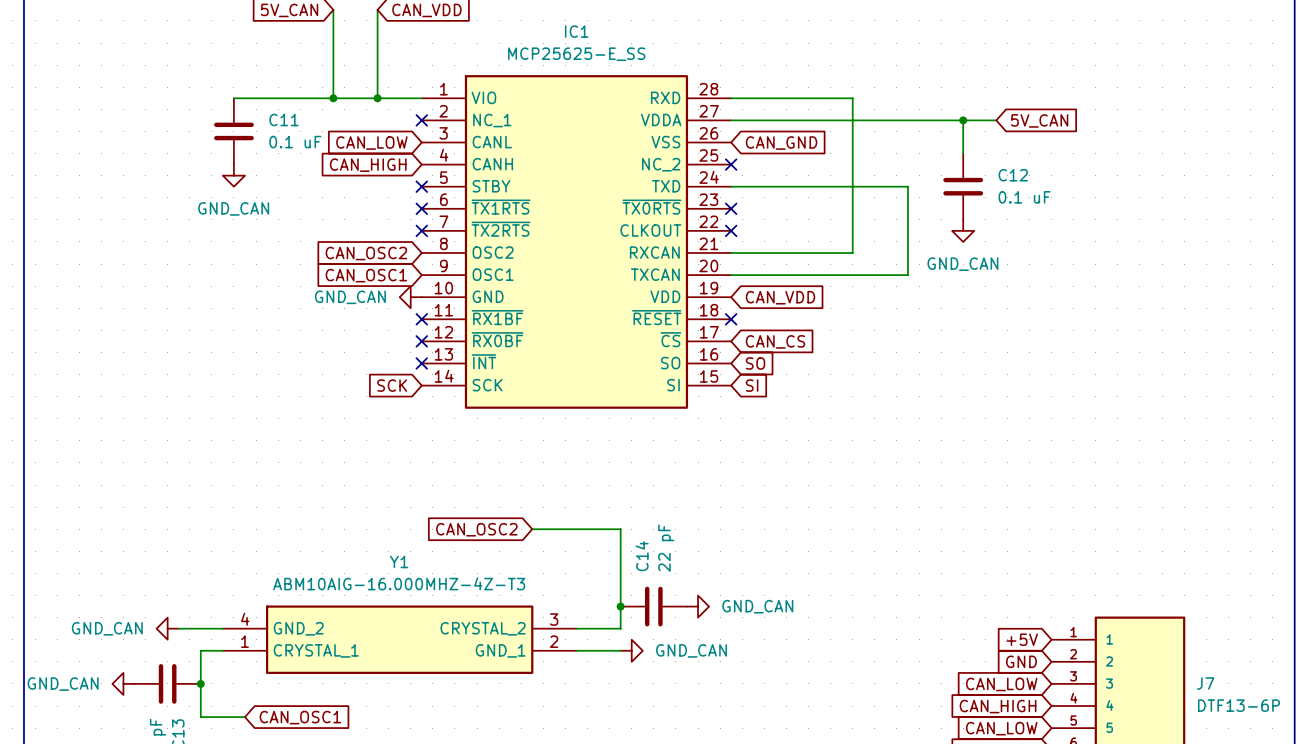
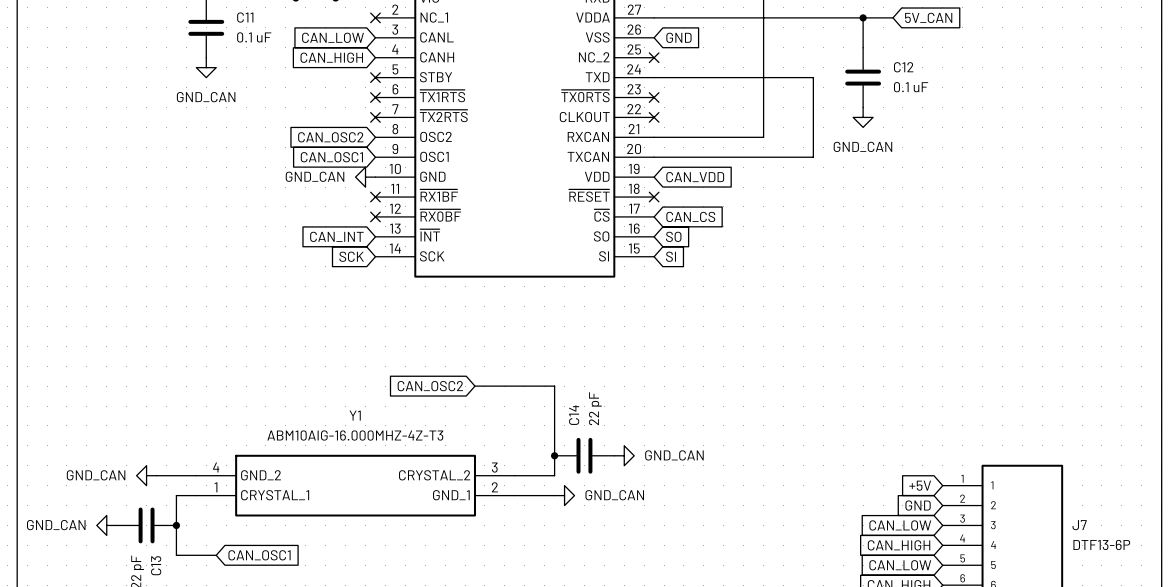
global label: CAN_GND (781, 143) -> GND (678, 37)
no-connect mark: (421, 363) -> none
global label: none -> CAN_INT (336, 236)

